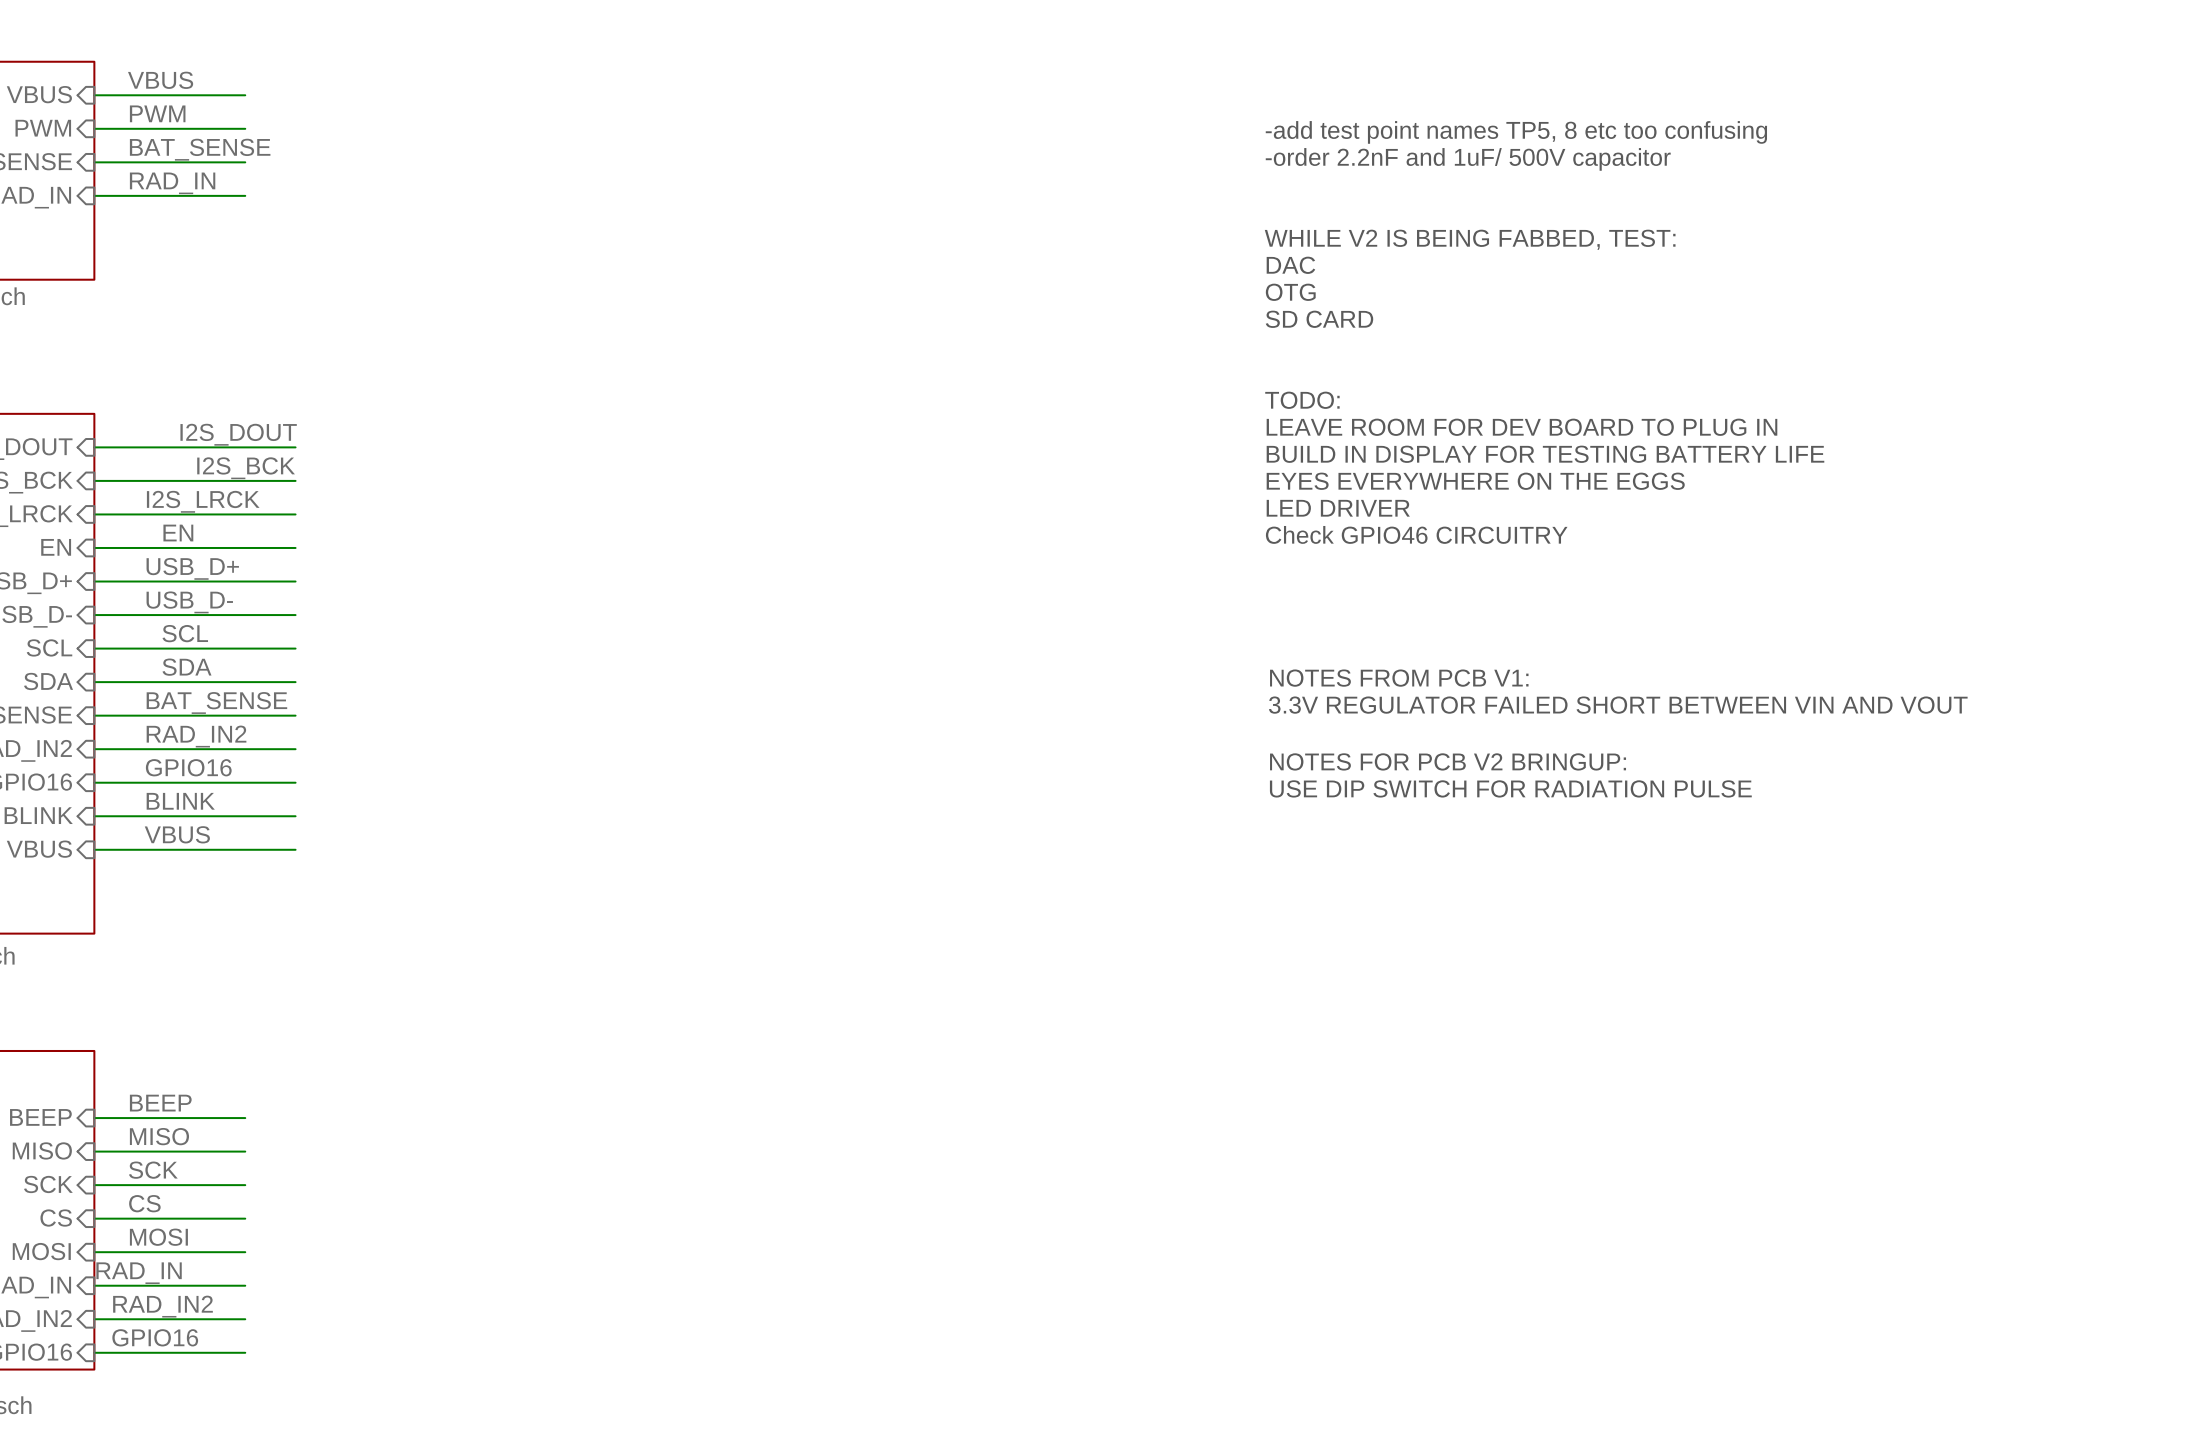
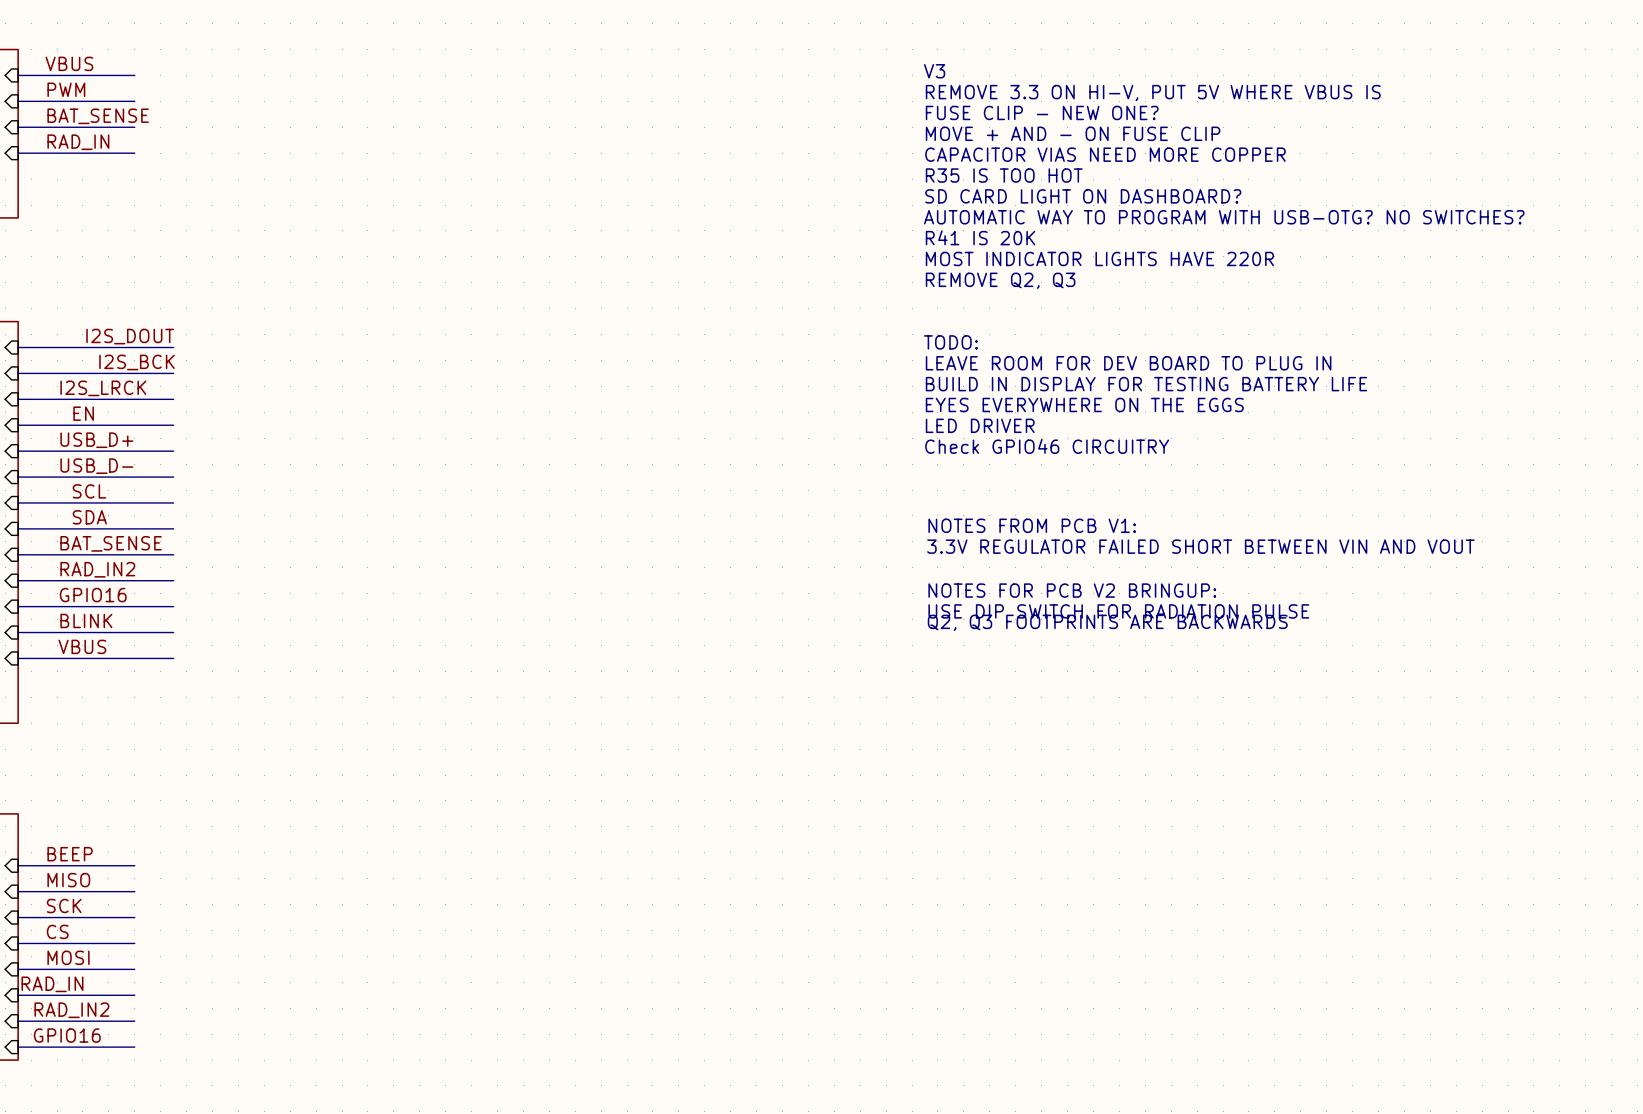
text: none -> V3 (934, 71)
text: none -> REMOVE 3.3 ON HI-V, PUT 5V WHERE VBUS IS (1153, 93)
text: -add test point names TP5, 8 etc too confusing (1516, 132) -> none
text: none -> FUSE CLIP - NEW ONE? (1042, 112)
text: -order 2.2nF and 1uF/ 500V capacitor (1468, 159) -> none
text: none -> MOVE + AND - ON FUSE CLIP (1073, 133)
text: none -> CAPACITOR VIAS NEED MORE COPPER (1105, 154)
text: none -> R35 IS TOO HOT (1004, 175)
text: WHILE V2 IS BEING FABBED, TEST: (1470, 239) -> none
text: none -> SD CARD LIGHT ON DASHBOARD? (1083, 196)
text: DAC (1290, 265) -> none
text: none -> AUTOMATIC WAY TO PROGRAM WITH USB-OTG? NO SWITCHES? (1224, 217)
text: OTG (1290, 292) -> none
text: none -> R41 IS 20K (980, 237)
text: SD CARD (1319, 319) -> none
text: none -> MOST INDICATOR LIGHTS HAVE 220R (1099, 258)
text: none -> REMOVE Q2, Q3 (1000, 280)
text position: TODO: (1302, 400) -> TODO: (950, 342)
text position: LEAVE ROOM FOR DEV BOARD TO PLUG IN (1521, 427) -> LEAVE ROOM FOR DEV BOARD TO PLUG IN (1128, 363)
text position: BUILD IN DISPLAY FOR TESTING BATTERY LIFE (1545, 454) -> BUILD IN DISPLAY FOR TESTING BATTERY LIFE (1146, 384)
text position: EYES EVERYWHERE ON THE EGGS (1475, 481) -> EYES EVERYWHERE ON THE EGGS (1084, 404)
text position: LED DRIVER (1338, 508) -> LED DRIVER (980, 425)
text position: Check GPIO46 CIRCUITRY (1416, 534) -> Check GPIO46 CIRCUITRY (1047, 446)
text: none -> Q2, Q3 FOOTPRINTS ARE BACKWARDS (1107, 622)

